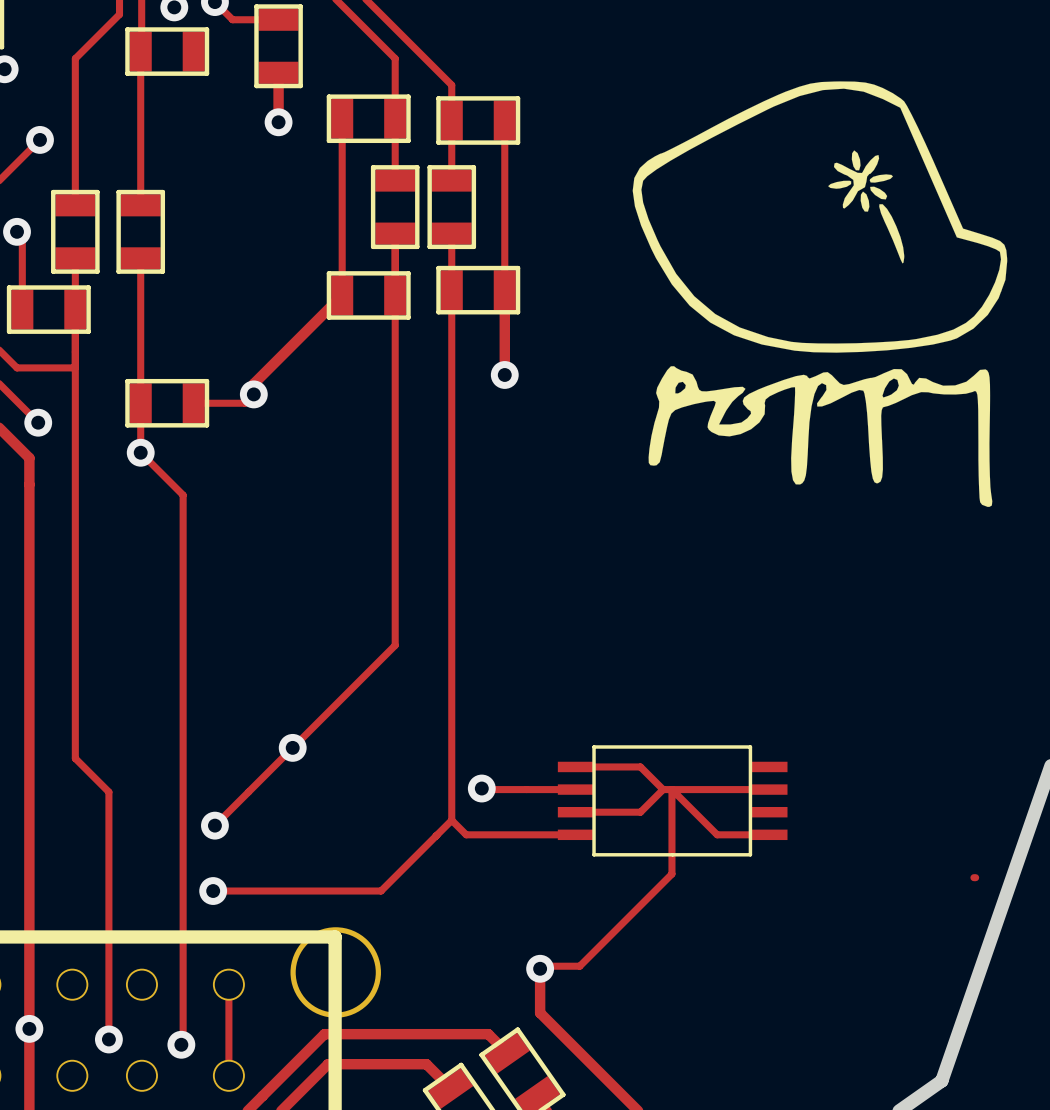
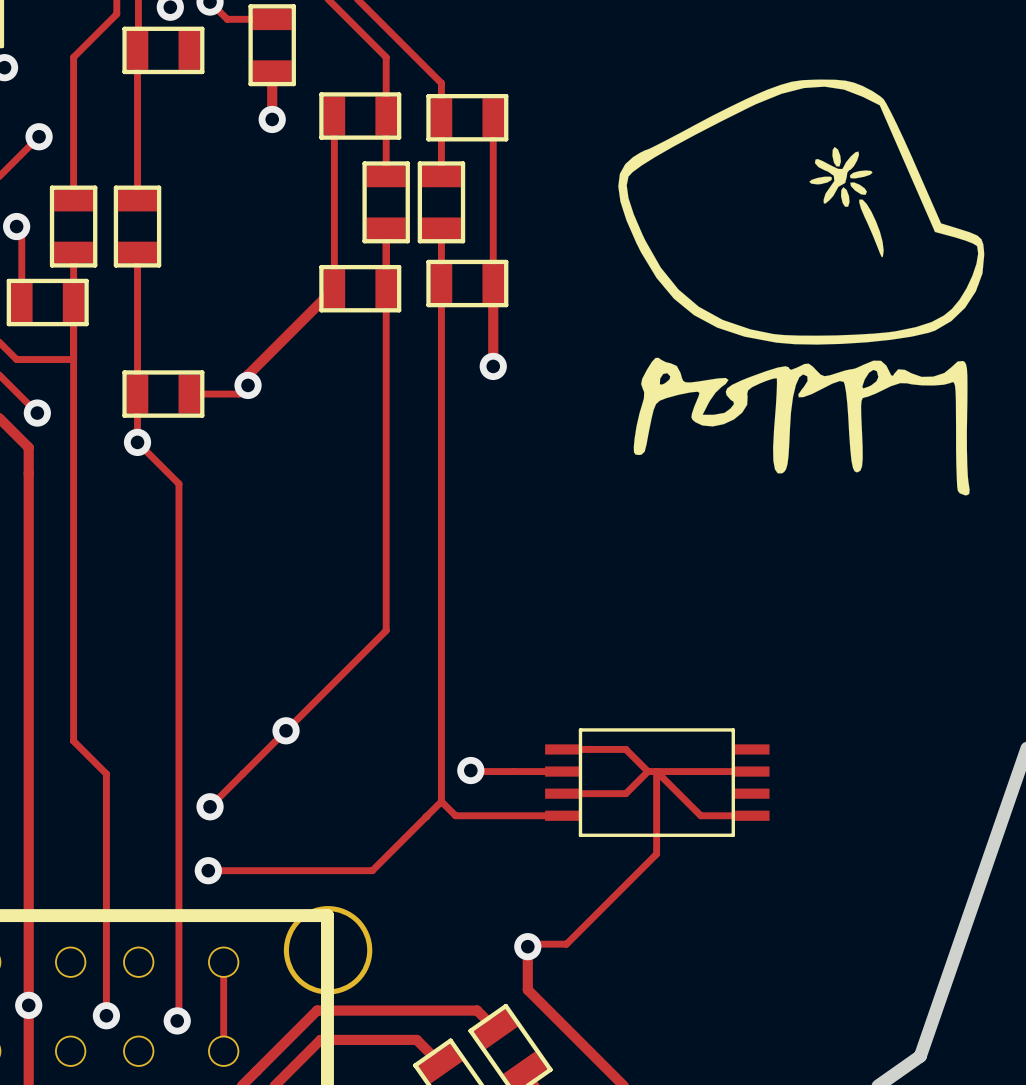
track: (973, 877) (975, 877) -> none

